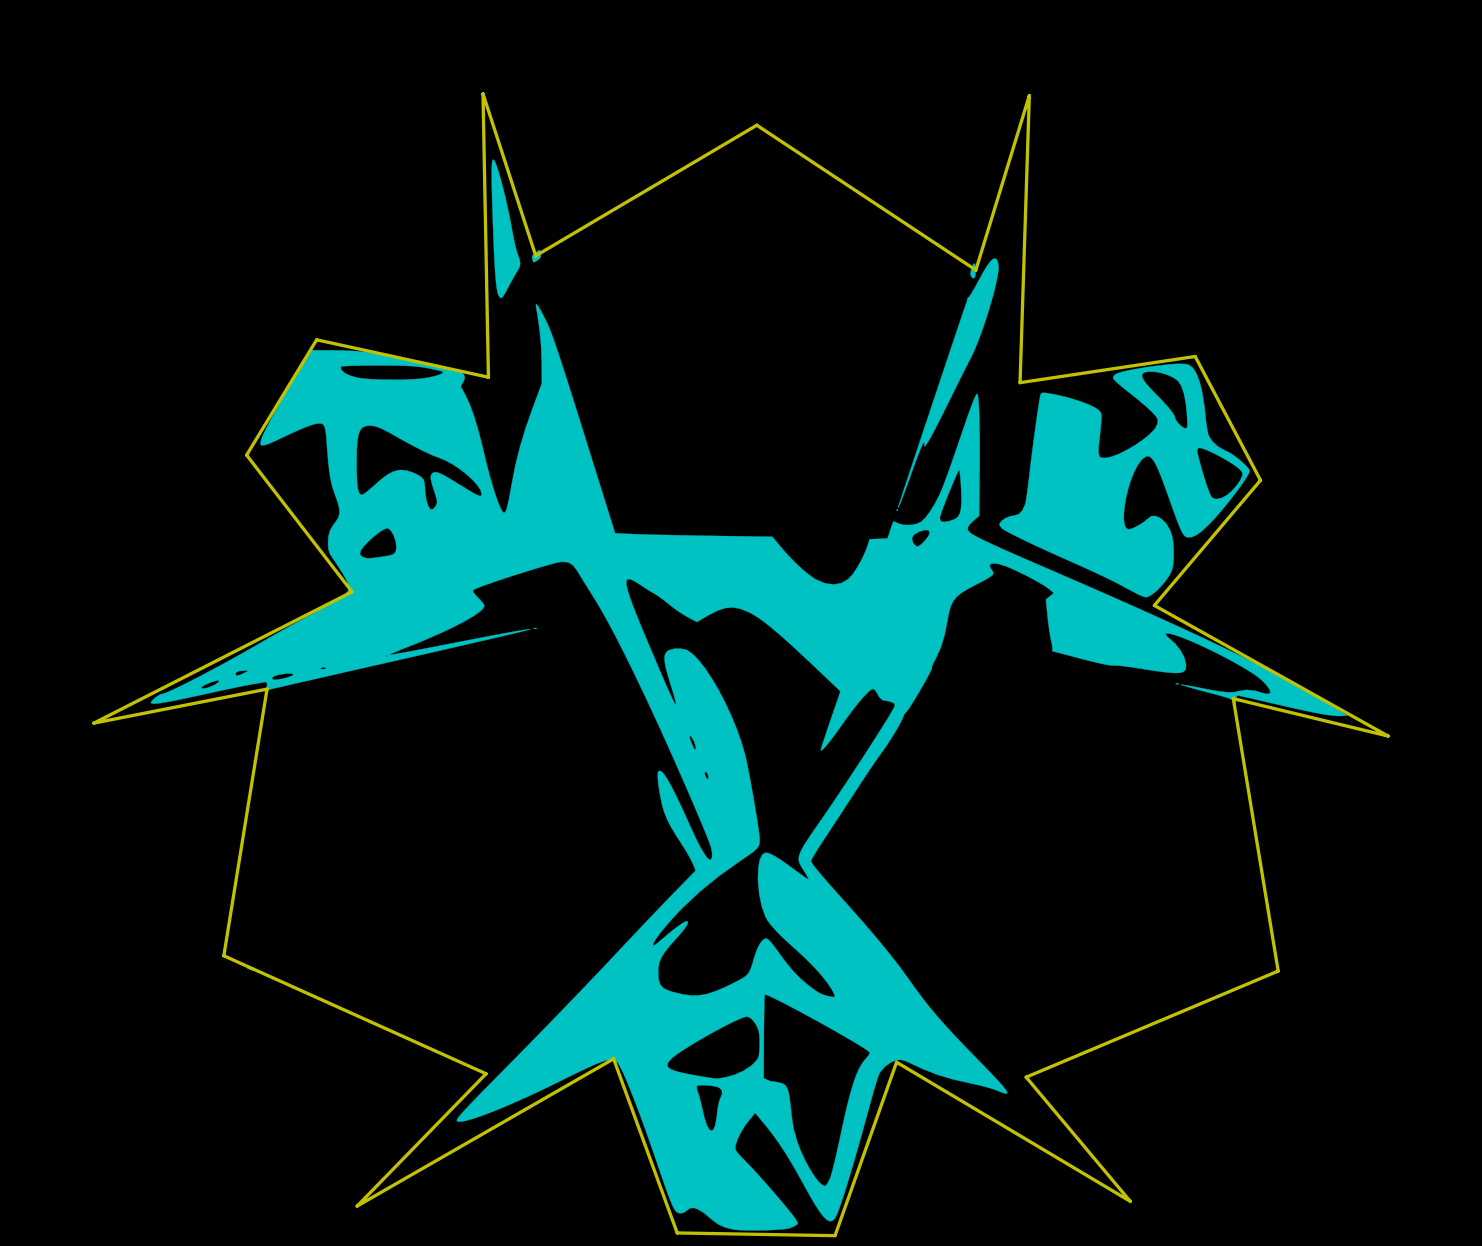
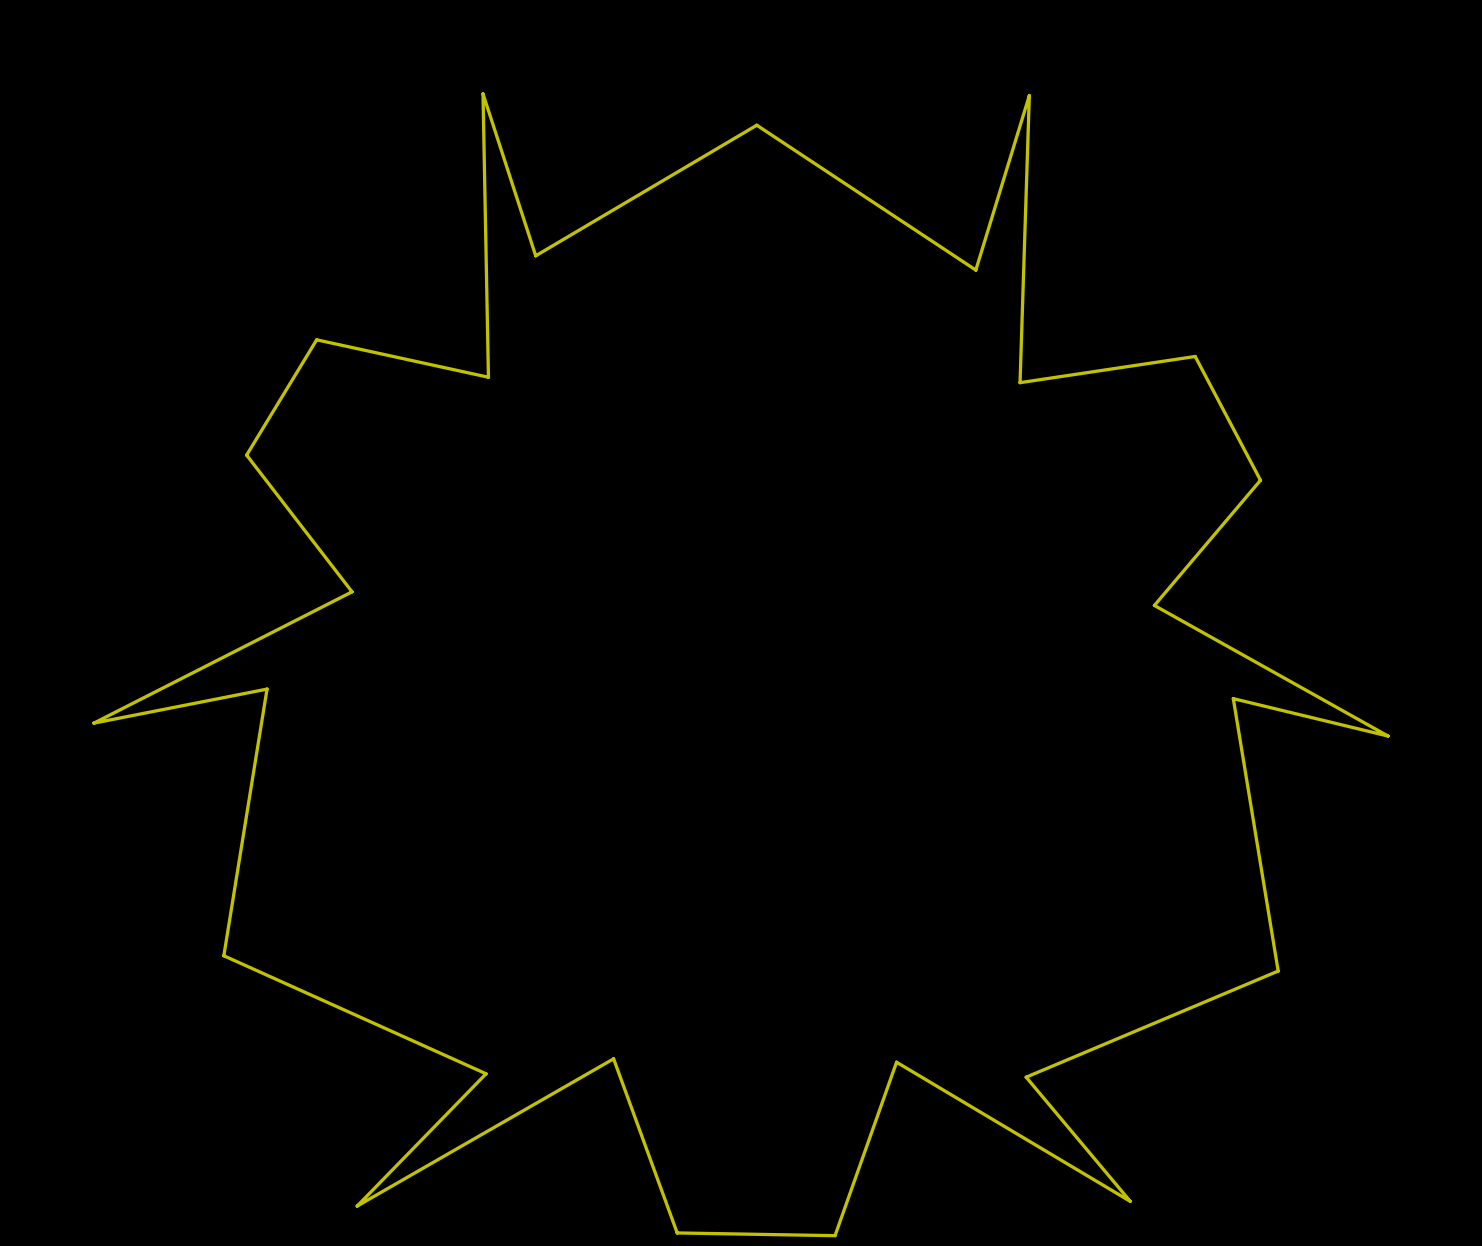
drawing: [150, 159, 1348, 1231] -> none

